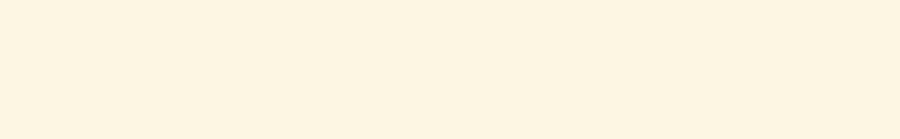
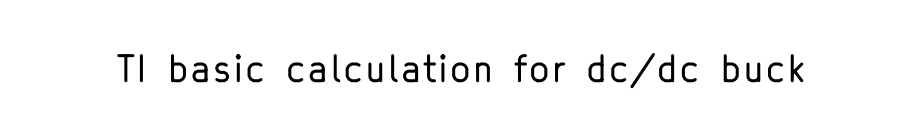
text: none -> TI basic calculation for dc/dc buck (460, 70)

